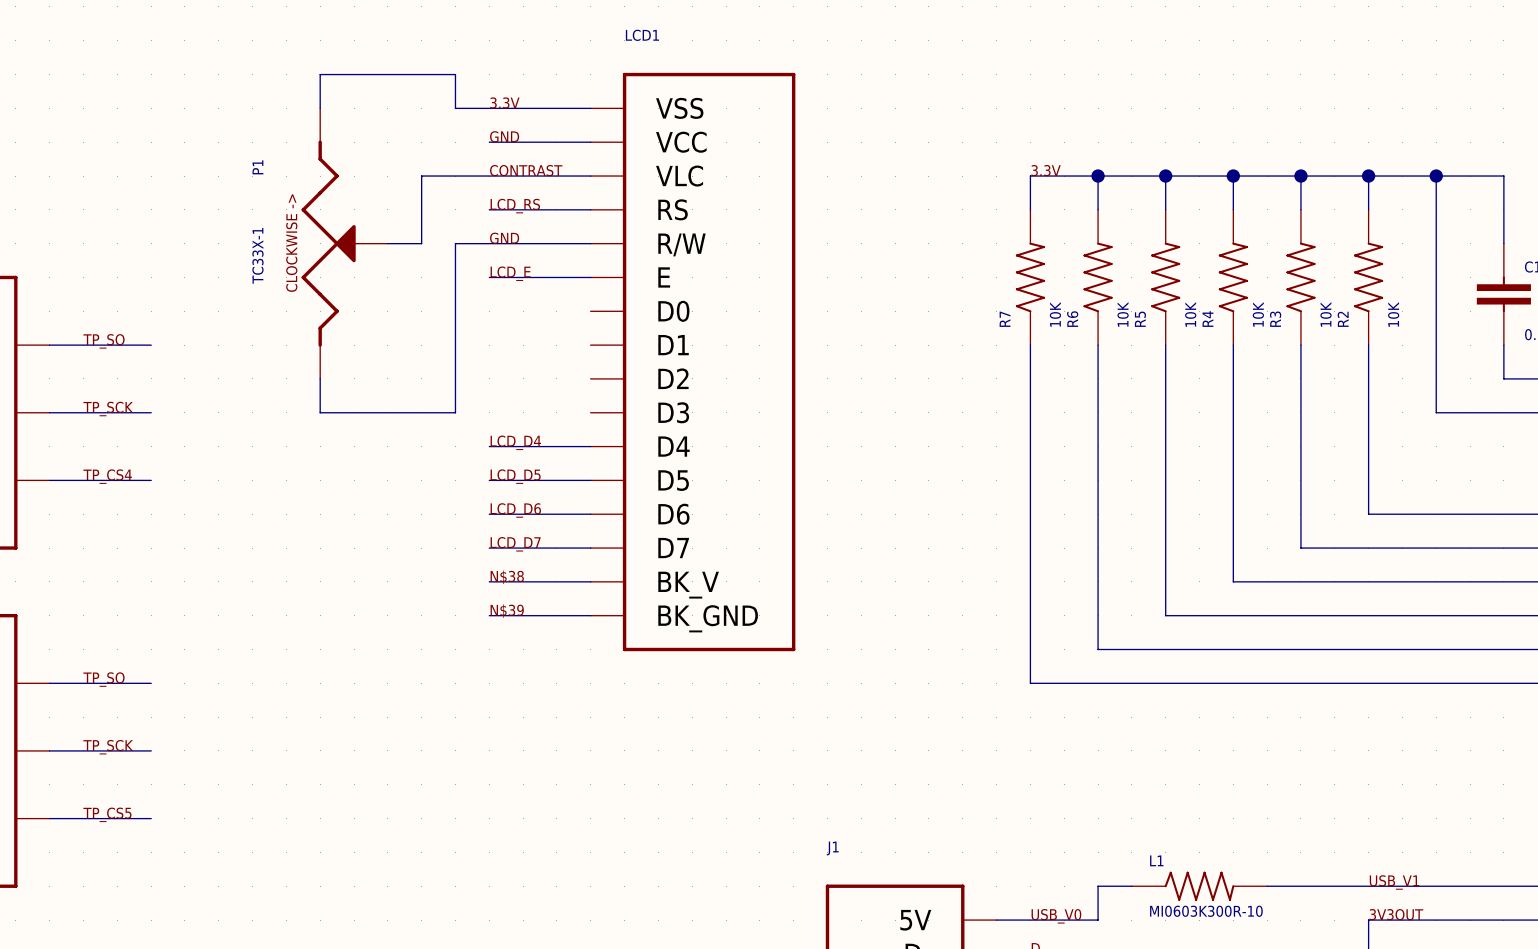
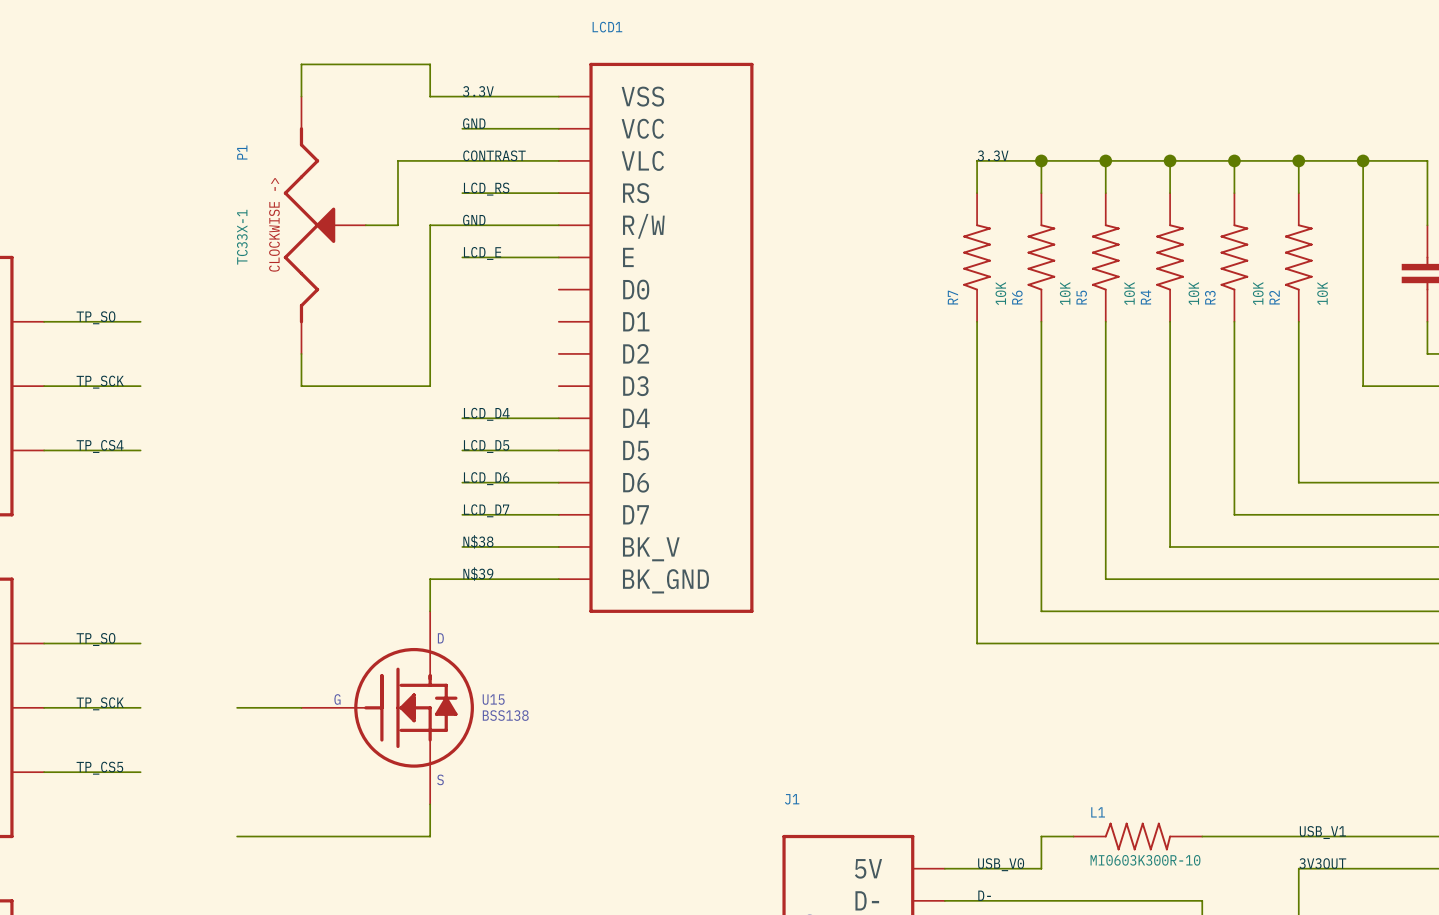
wire: none -> (462, 579) (430, 579) (430, 611)
wire: none -> (237, 707) (301, 707)
U15: none -> BSS138 (387, 707)
wire: none -> (430, 804) (430, 836) (237, 836)

